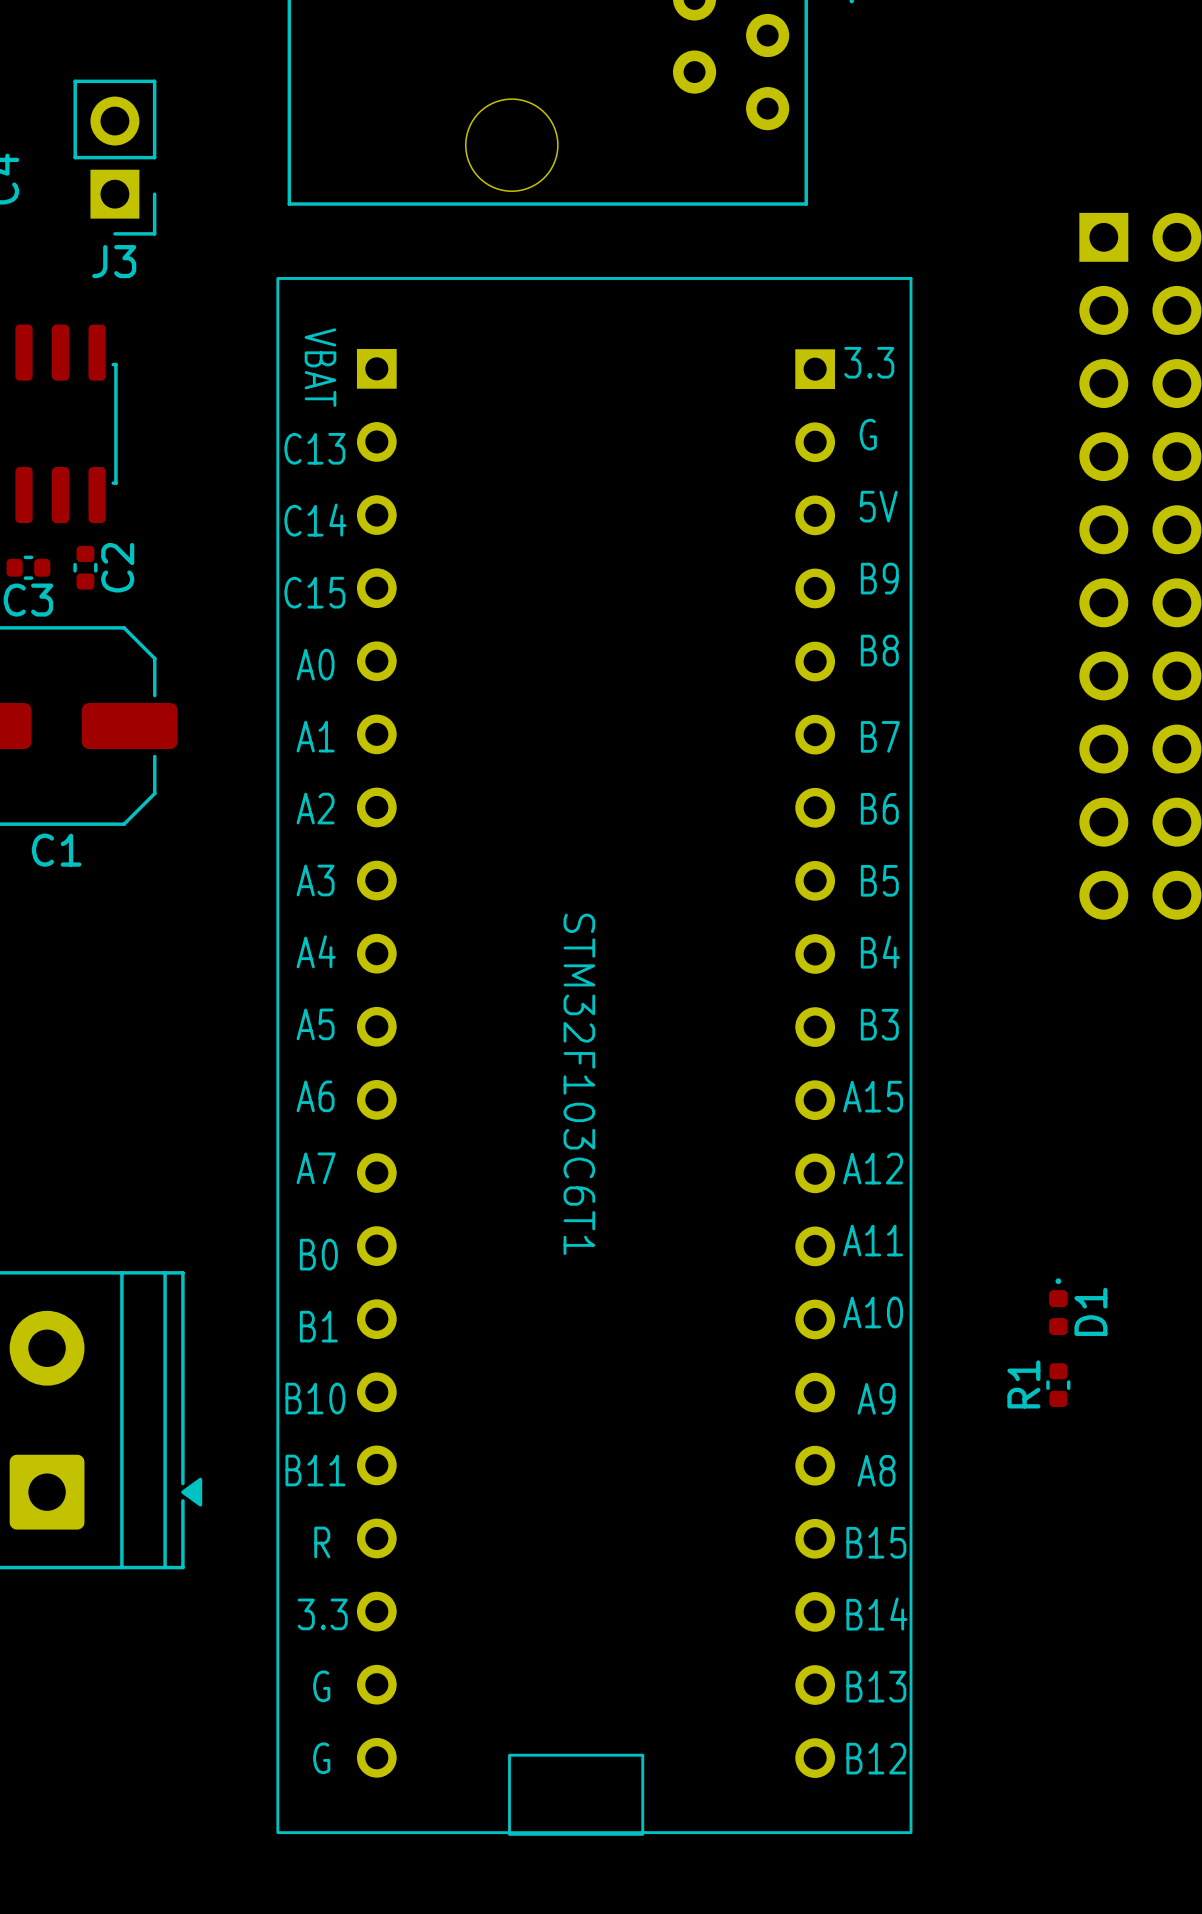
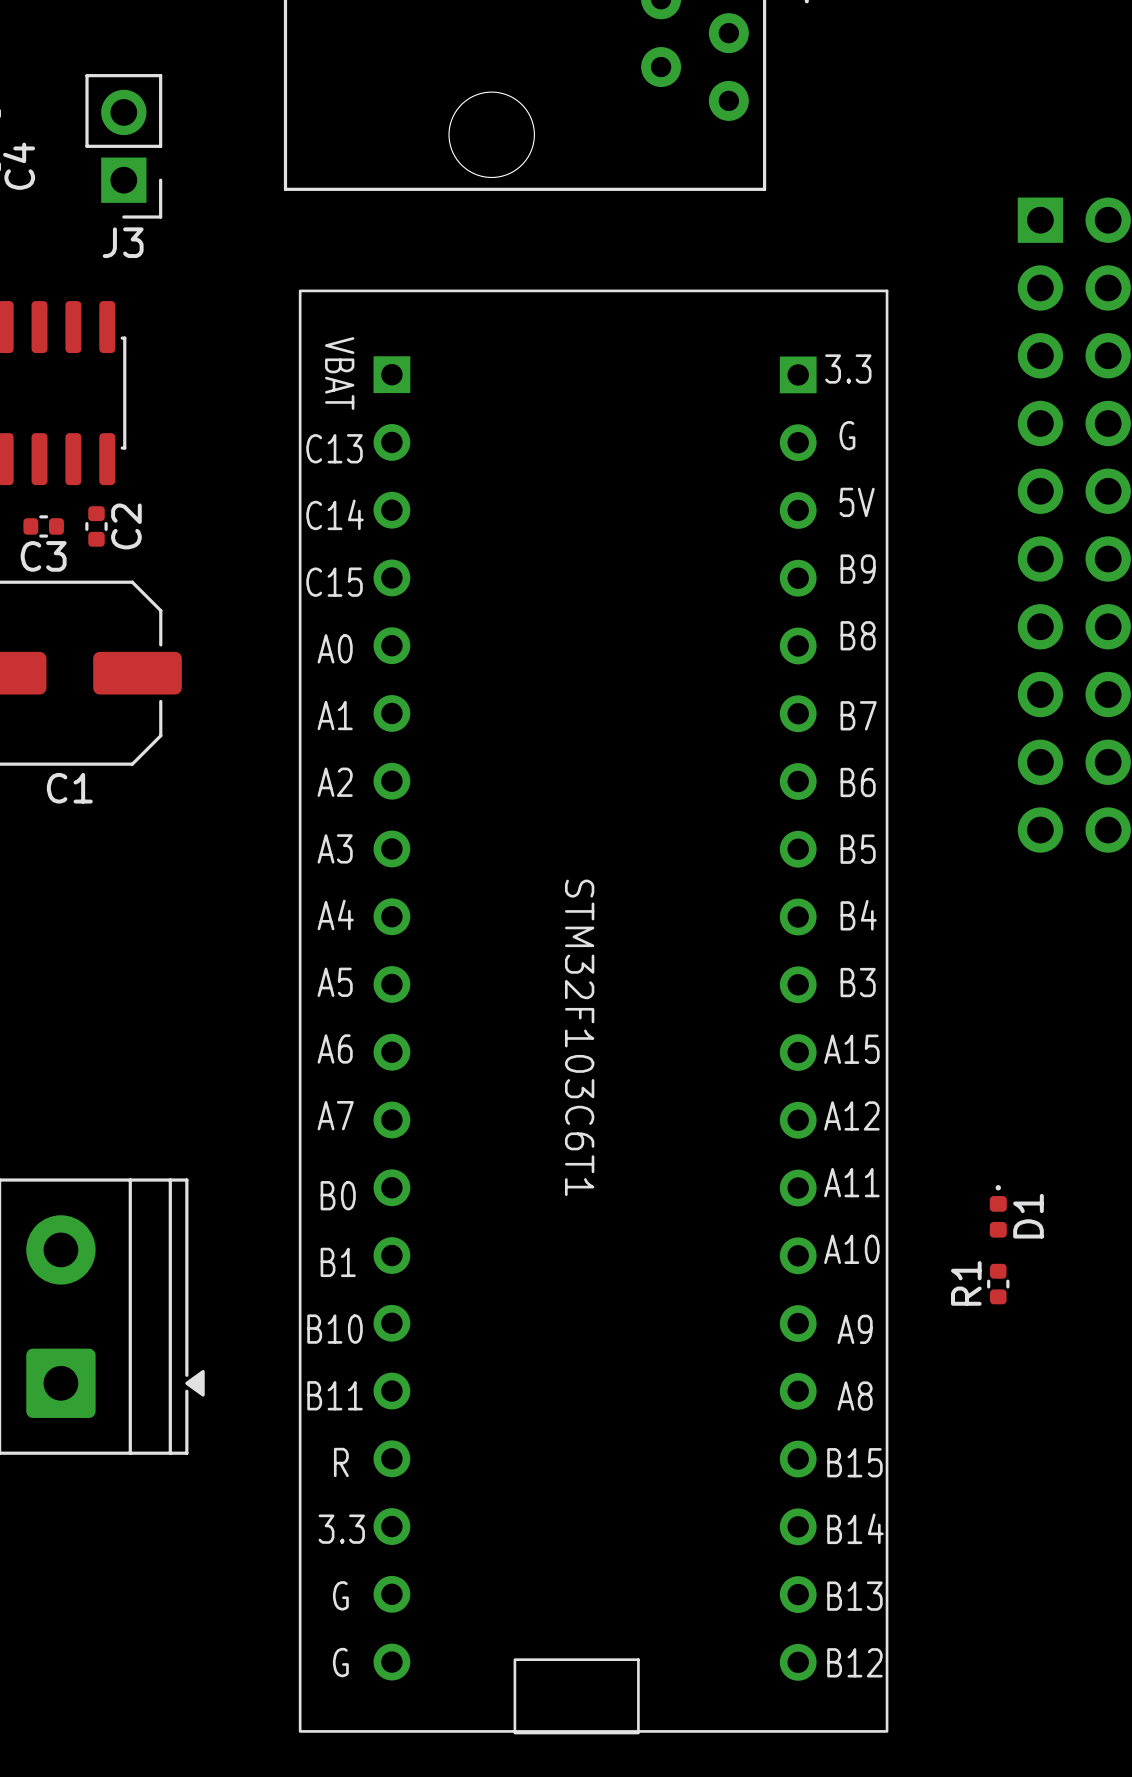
STM32F103C6T1 position: (594, 1056) -> (593, 1011)

